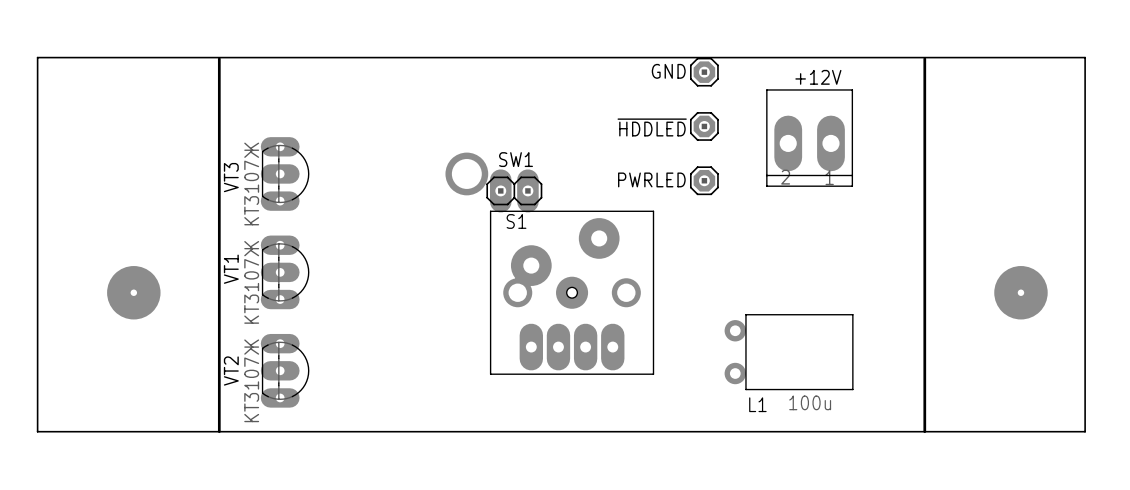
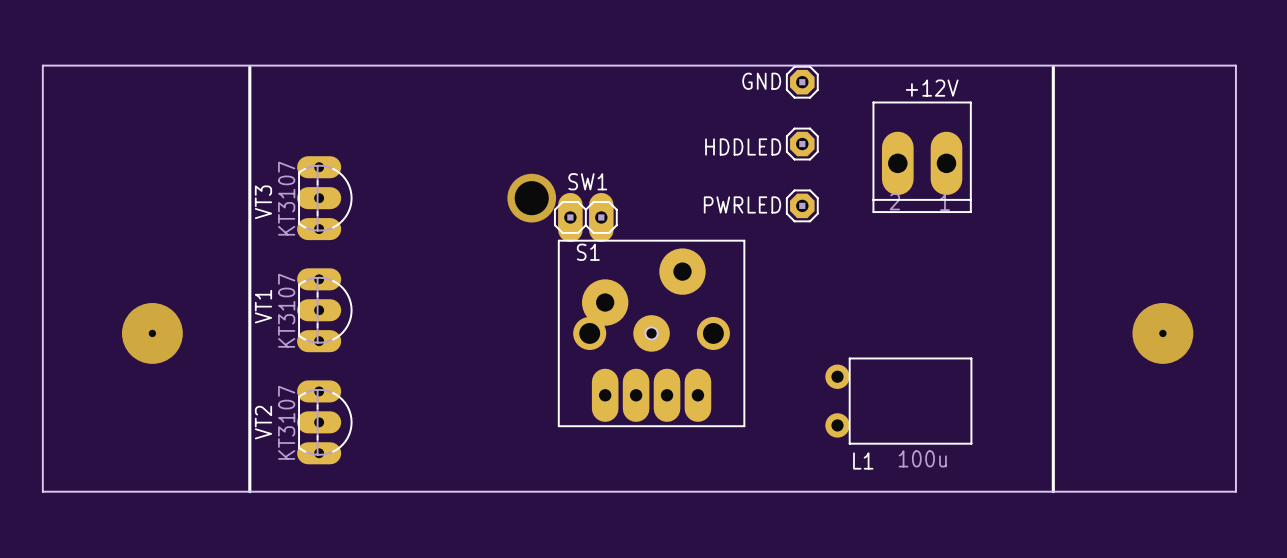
~{HDDLED} name: ~{HDDLED} (652, 127) -> HDDLED (743, 146)
VT3 value: KT3107Ж (251, 183) -> KT3107 (286, 198)
VT1 value: KT3107Ж (251, 282) -> KT3107 (286, 310)
VT2 value: KT3107Ж (251, 380) -> KT3107 (286, 422)

